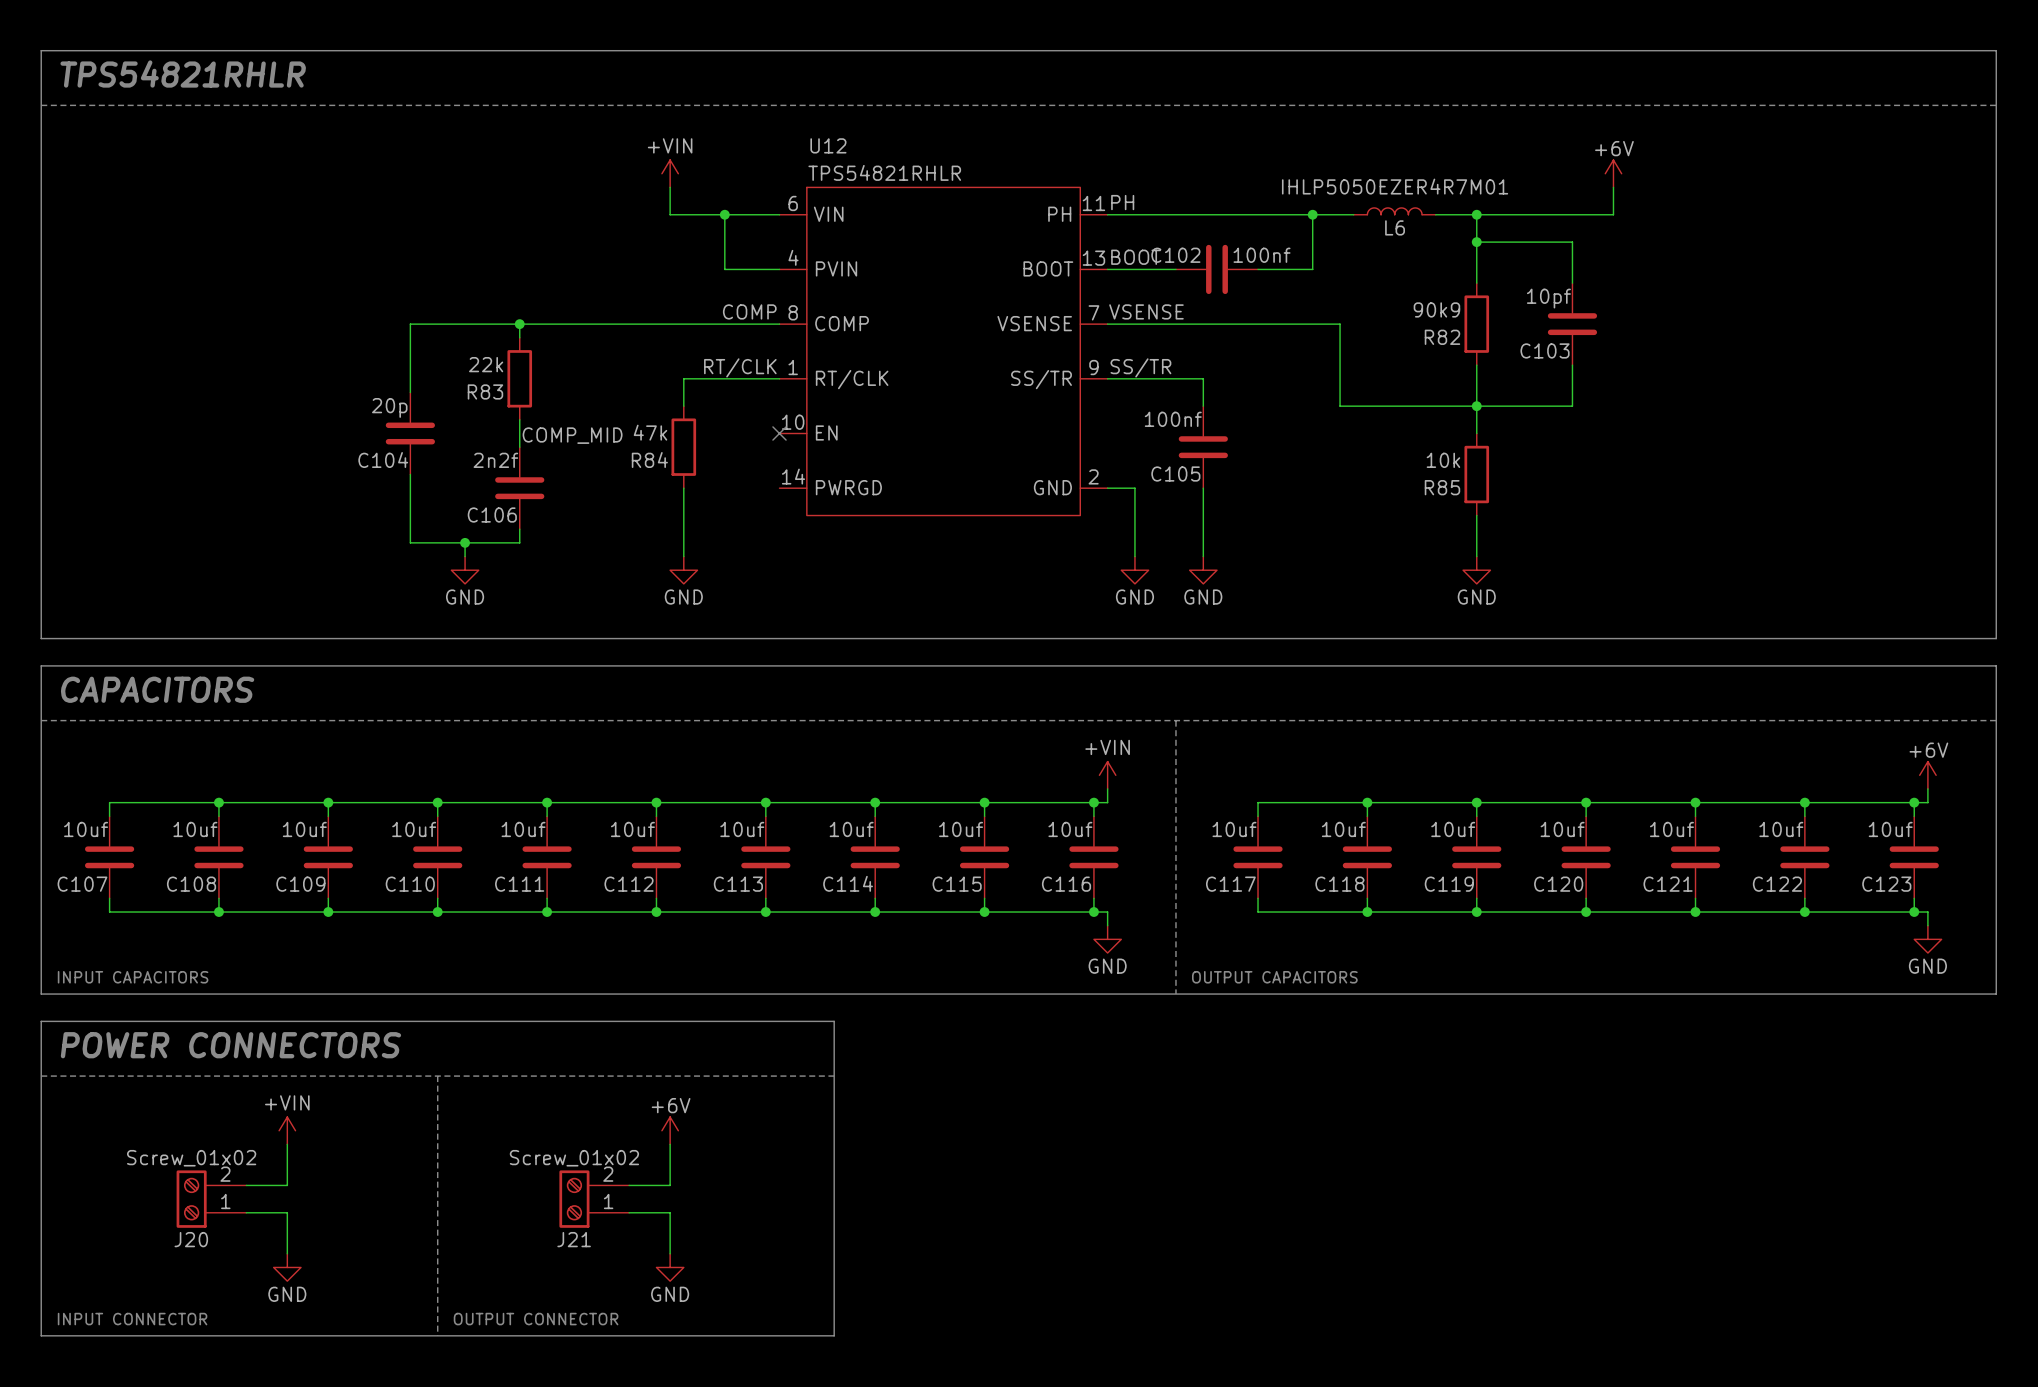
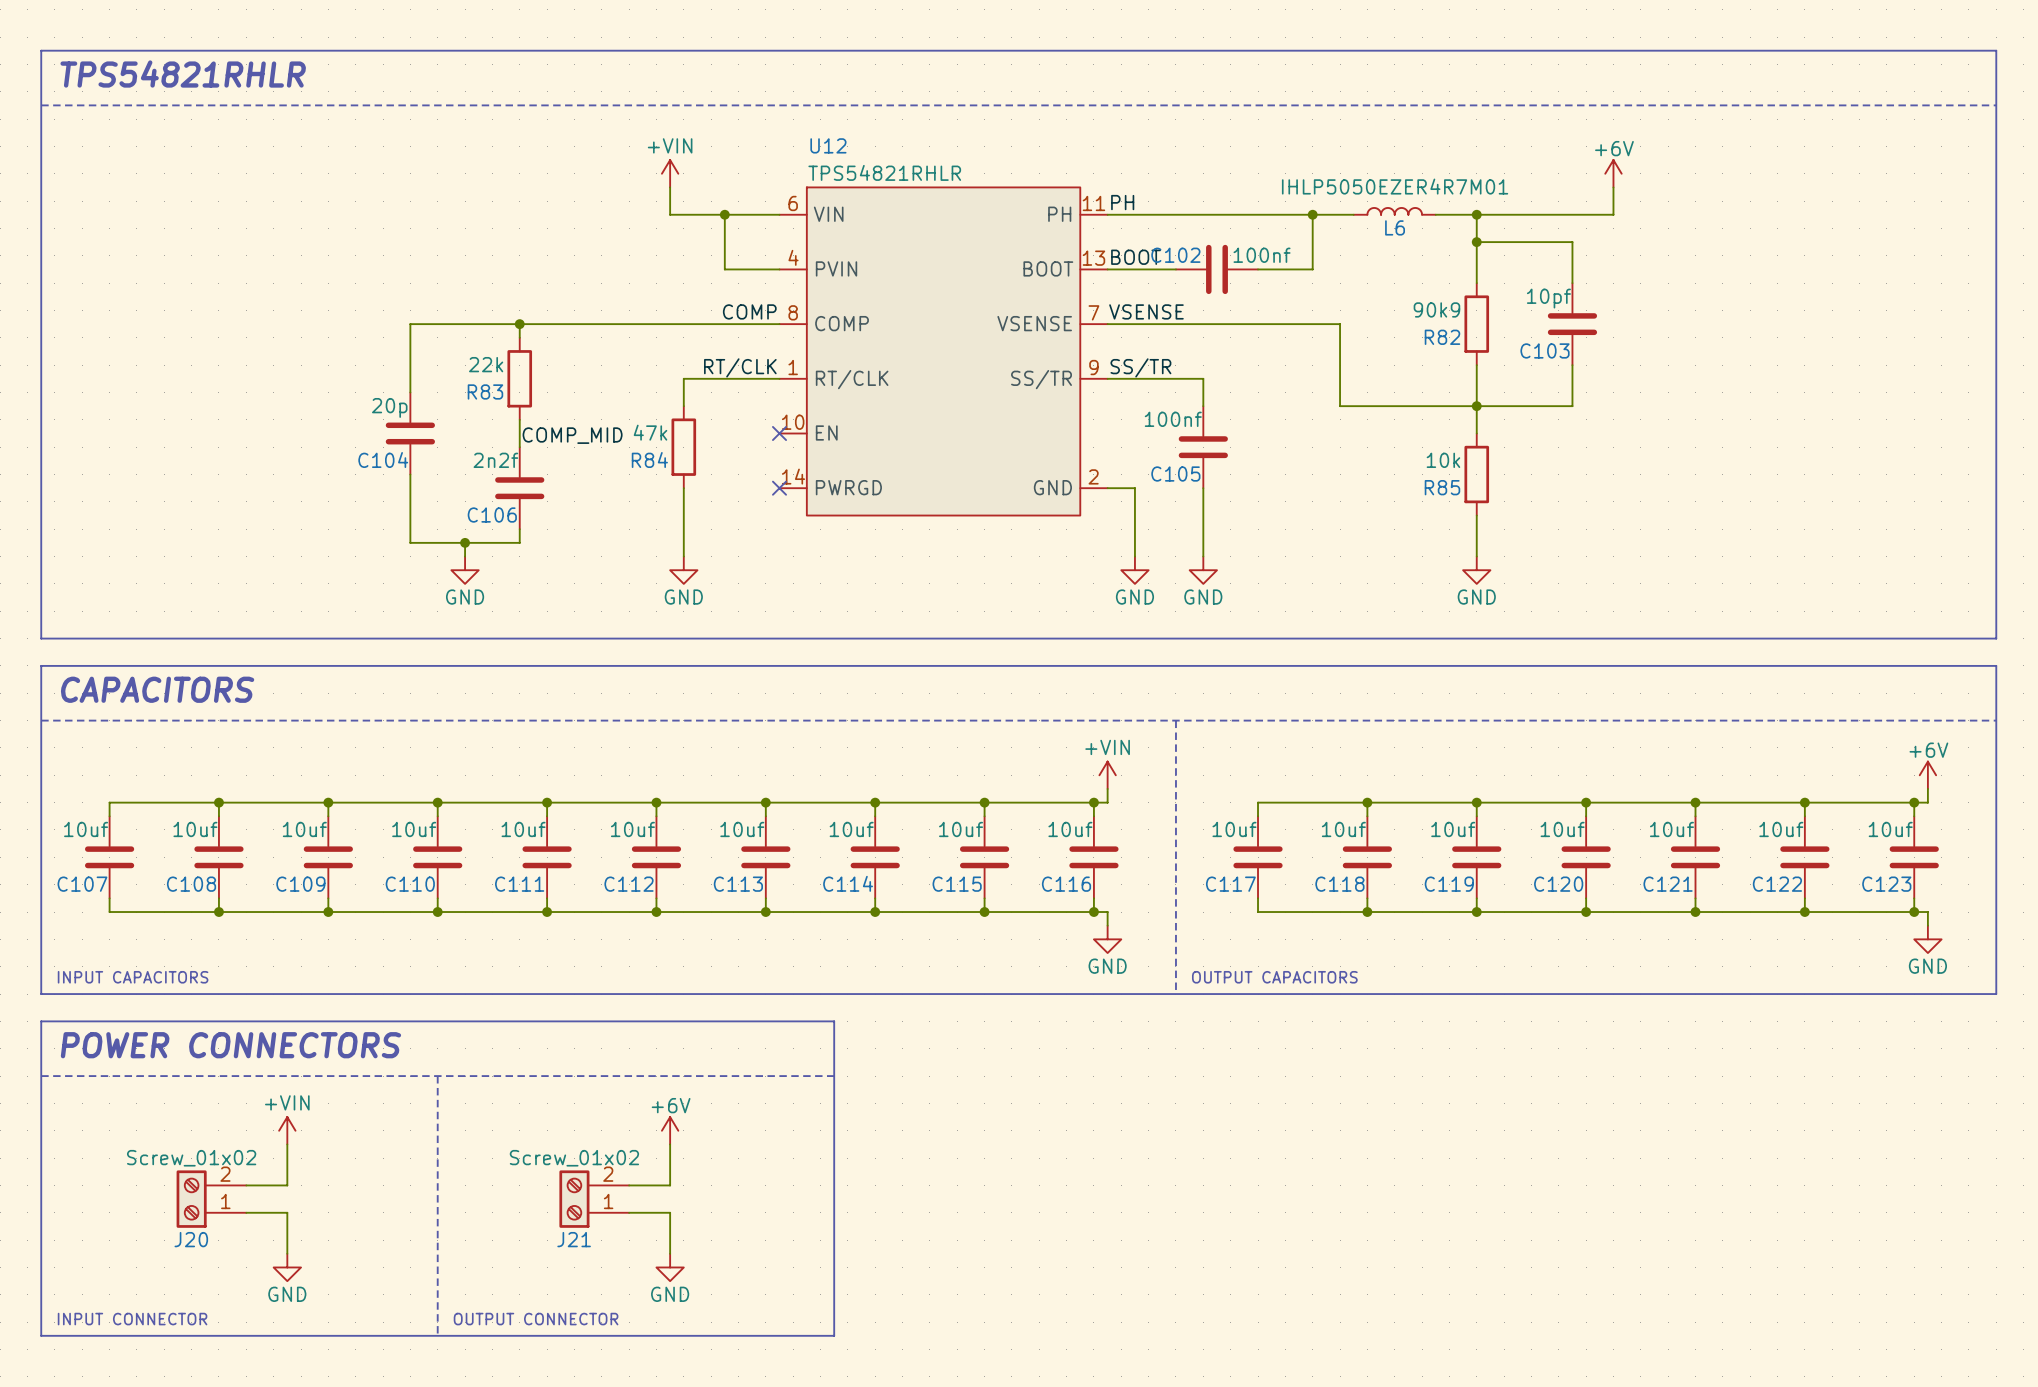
no-connect mark: none -> (779, 488)

